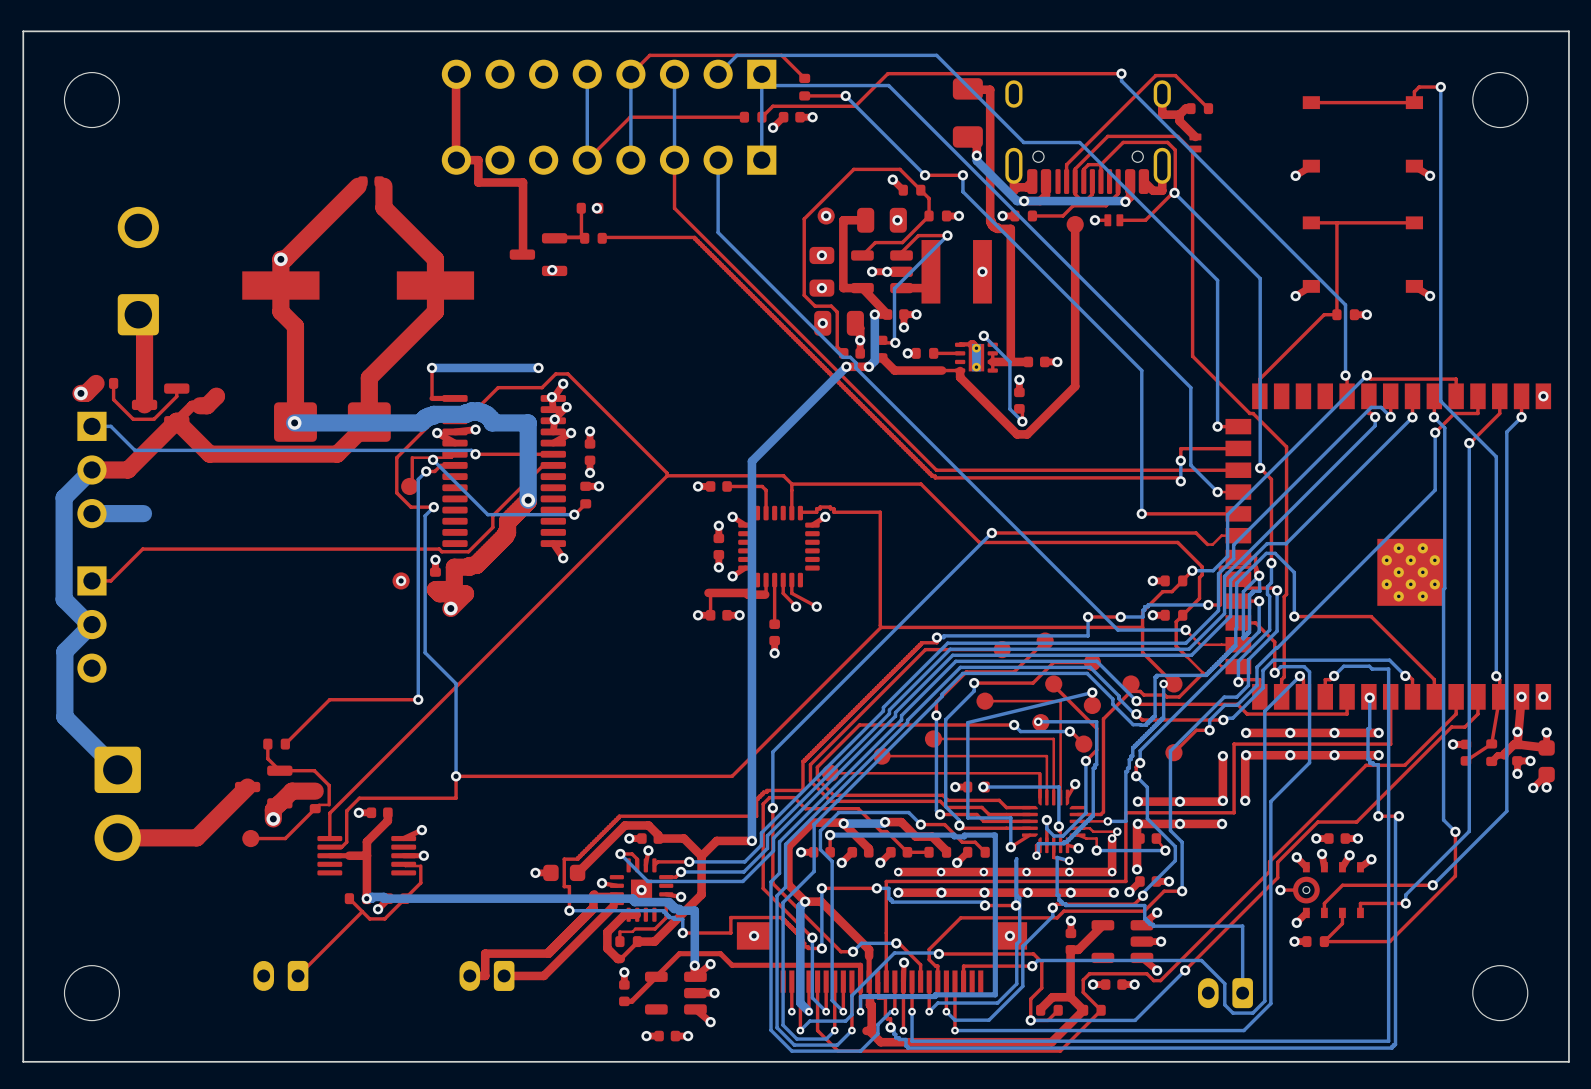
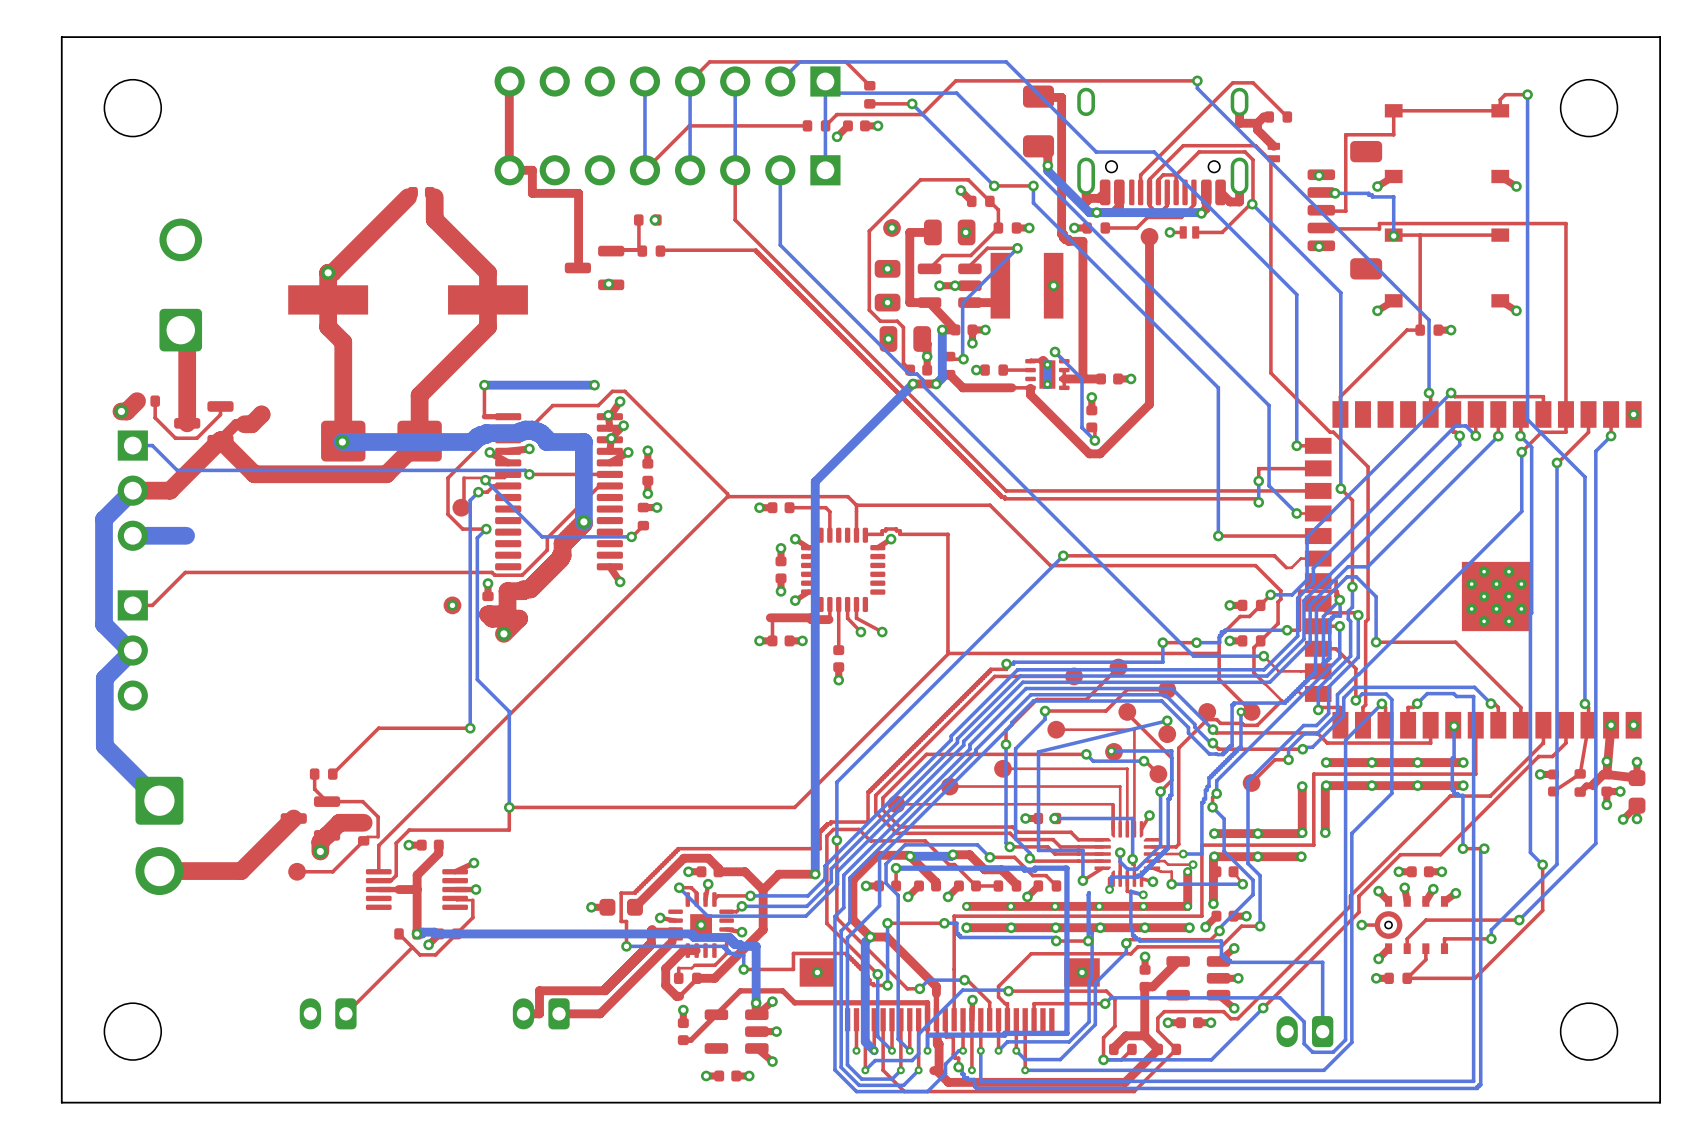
top track: none -> (1393, 110) (1393, 134) (1345, 134) (1345, 211) (1321, 210)
via: none -> (1319, 175)
bottom track: none -> (1335, 193) (1368, 193) (1372, 196) (1393, 196) (1393, 235)
via: none -> (1335, 193)
part: none -> (1344, 210)
top track: none -> (1321, 228) (1379, 228) (1379, 223) (1565, 223) (1565, 414)
via: none -> (1393, 235)
via: none -> (1319, 246)

